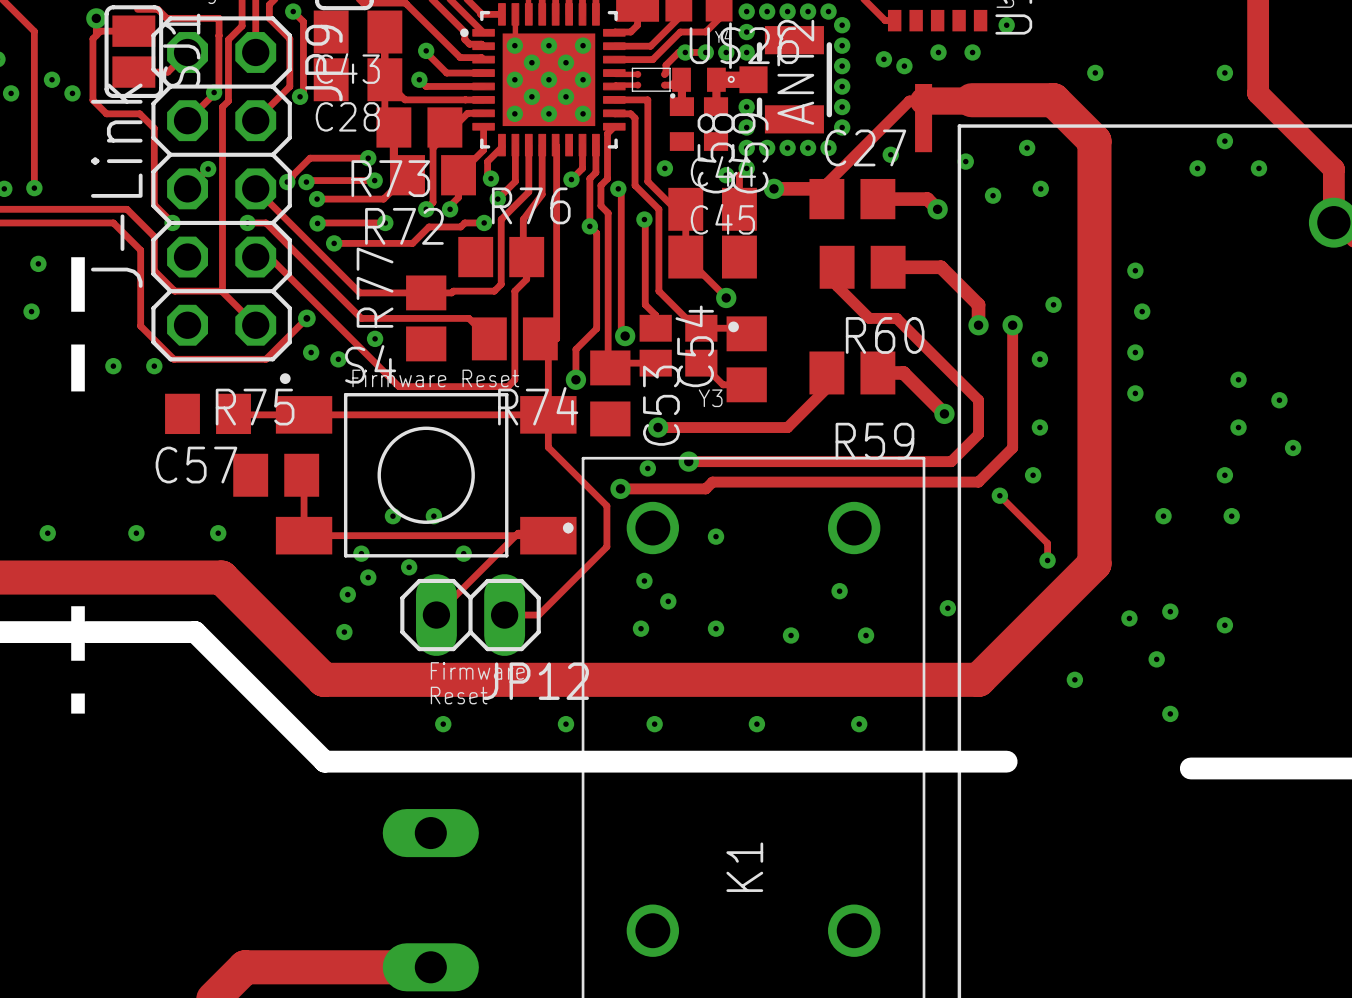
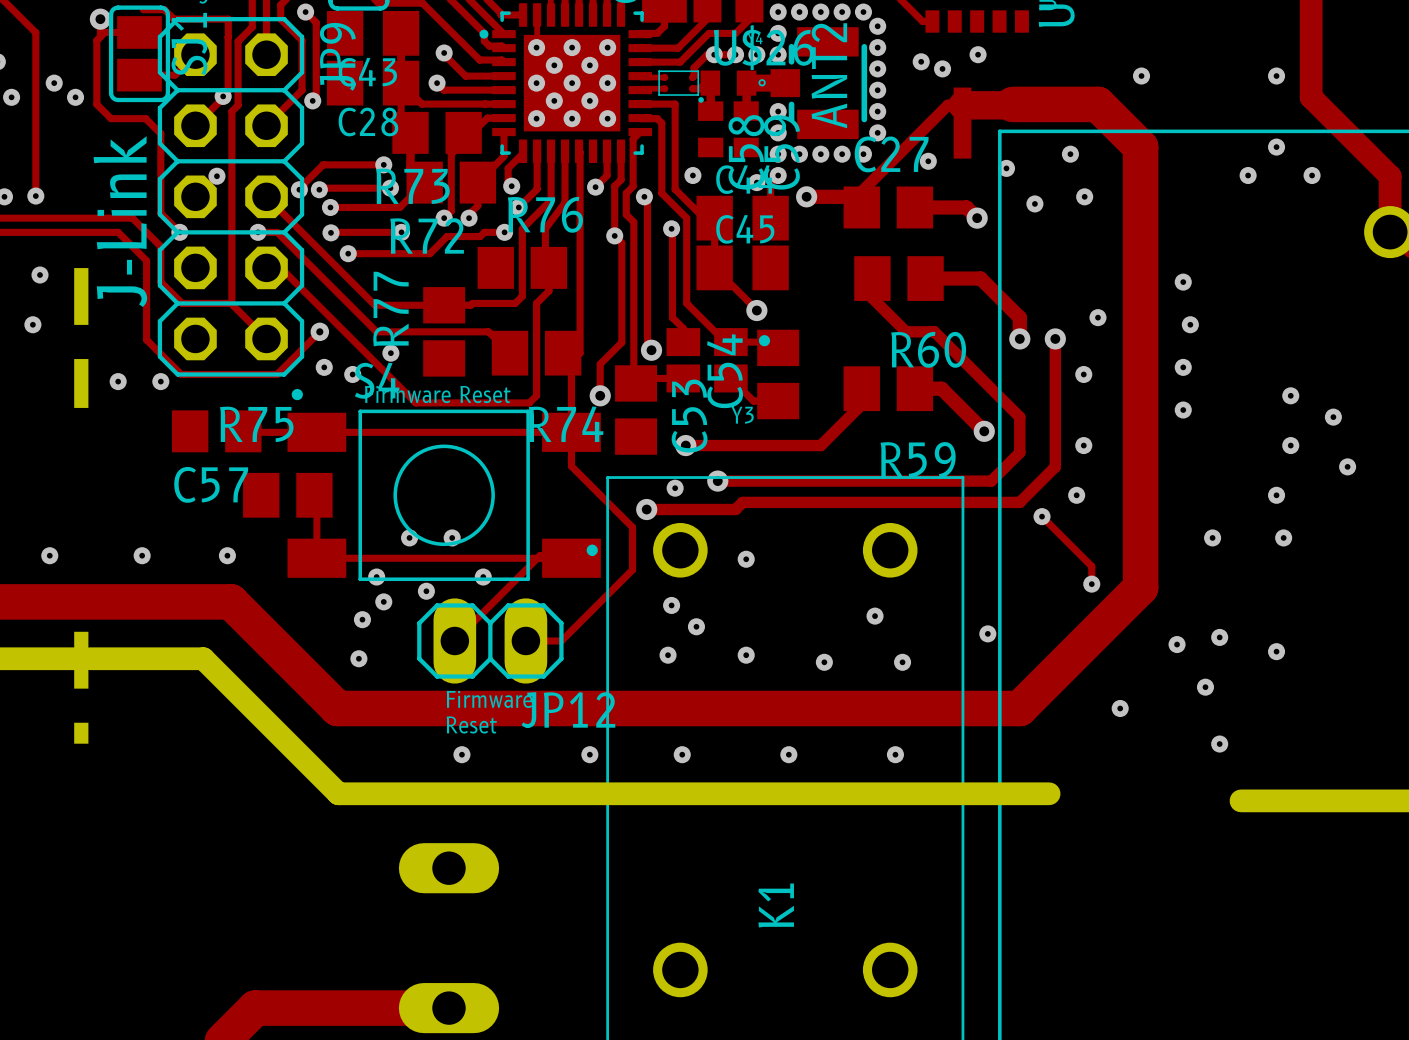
via: (1006, 25) -> none
via: (972, 52) -> none

